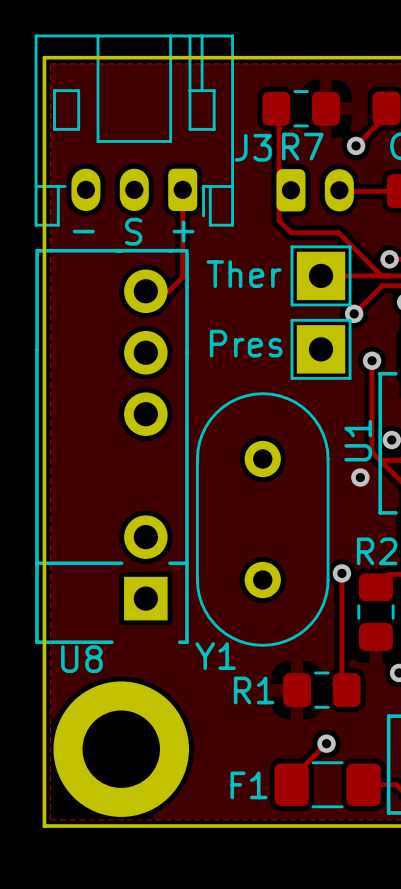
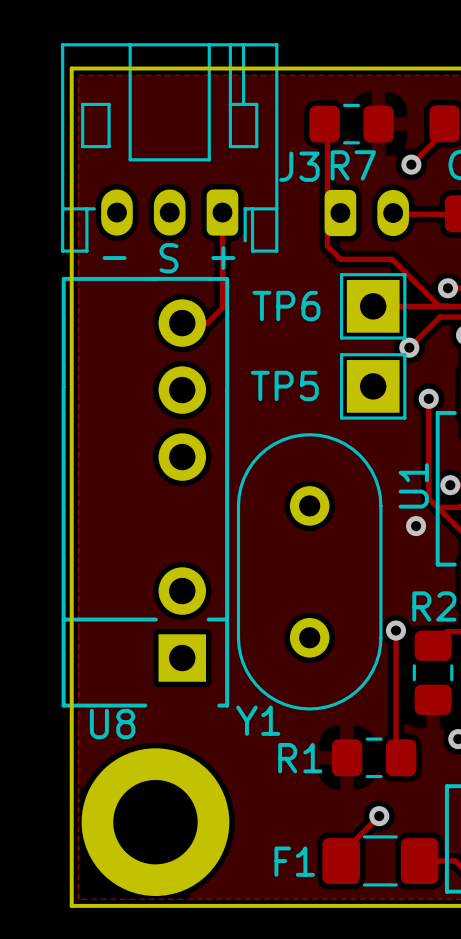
text: Ther (244, 274) -> none
TP6 name: none -> TP6 (286, 305)
text: Pres (246, 343) -> none
TP5 name: none -> TP5 (284, 385)

